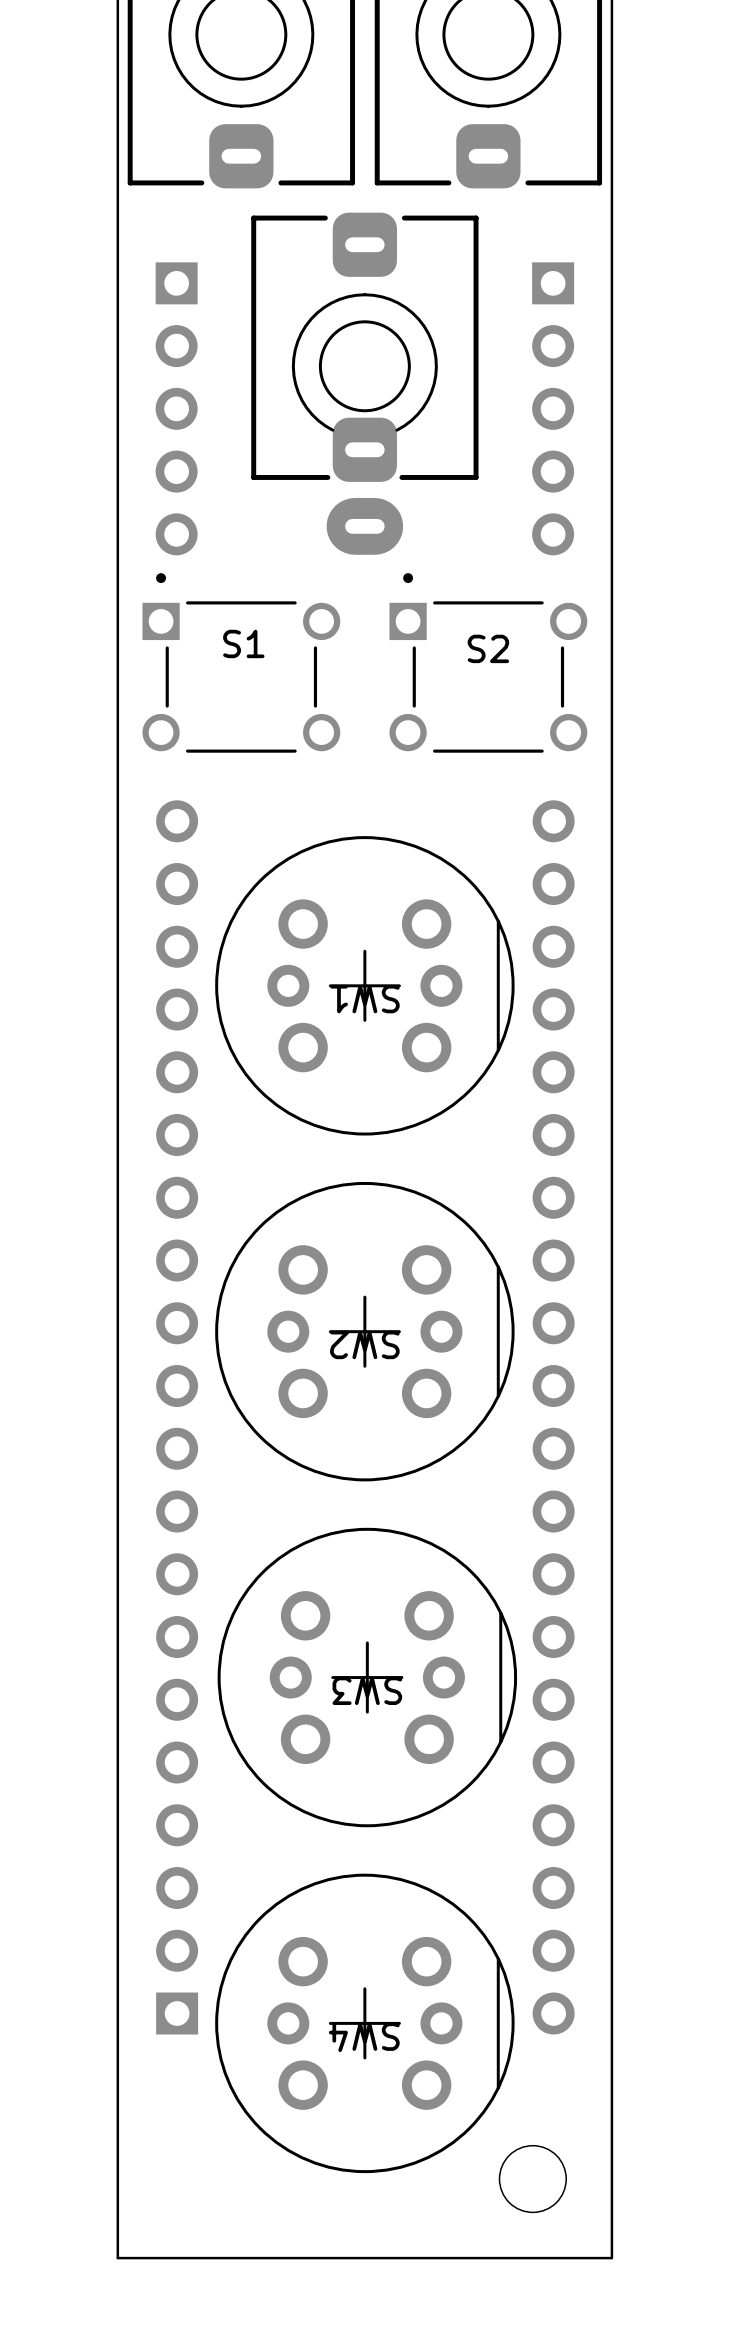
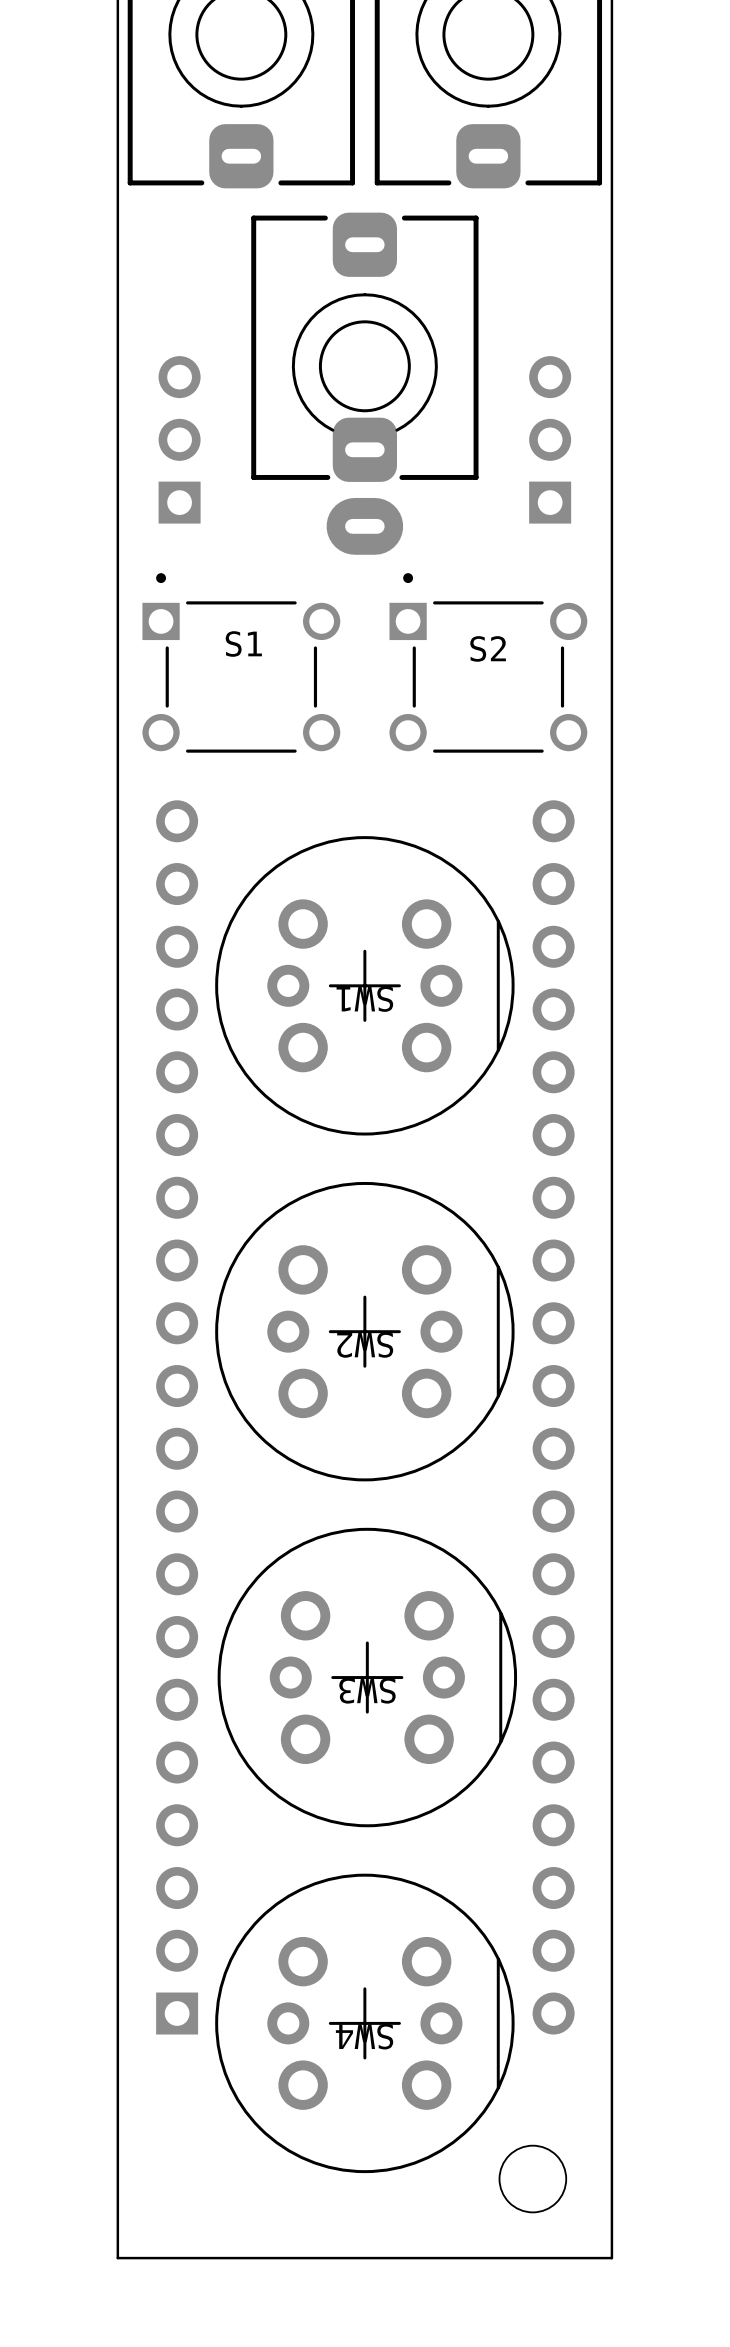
part: (176, 408) -> none
part: (553, 408) -> none
part: none -> (179, 439)
part: none -> (550, 439)

